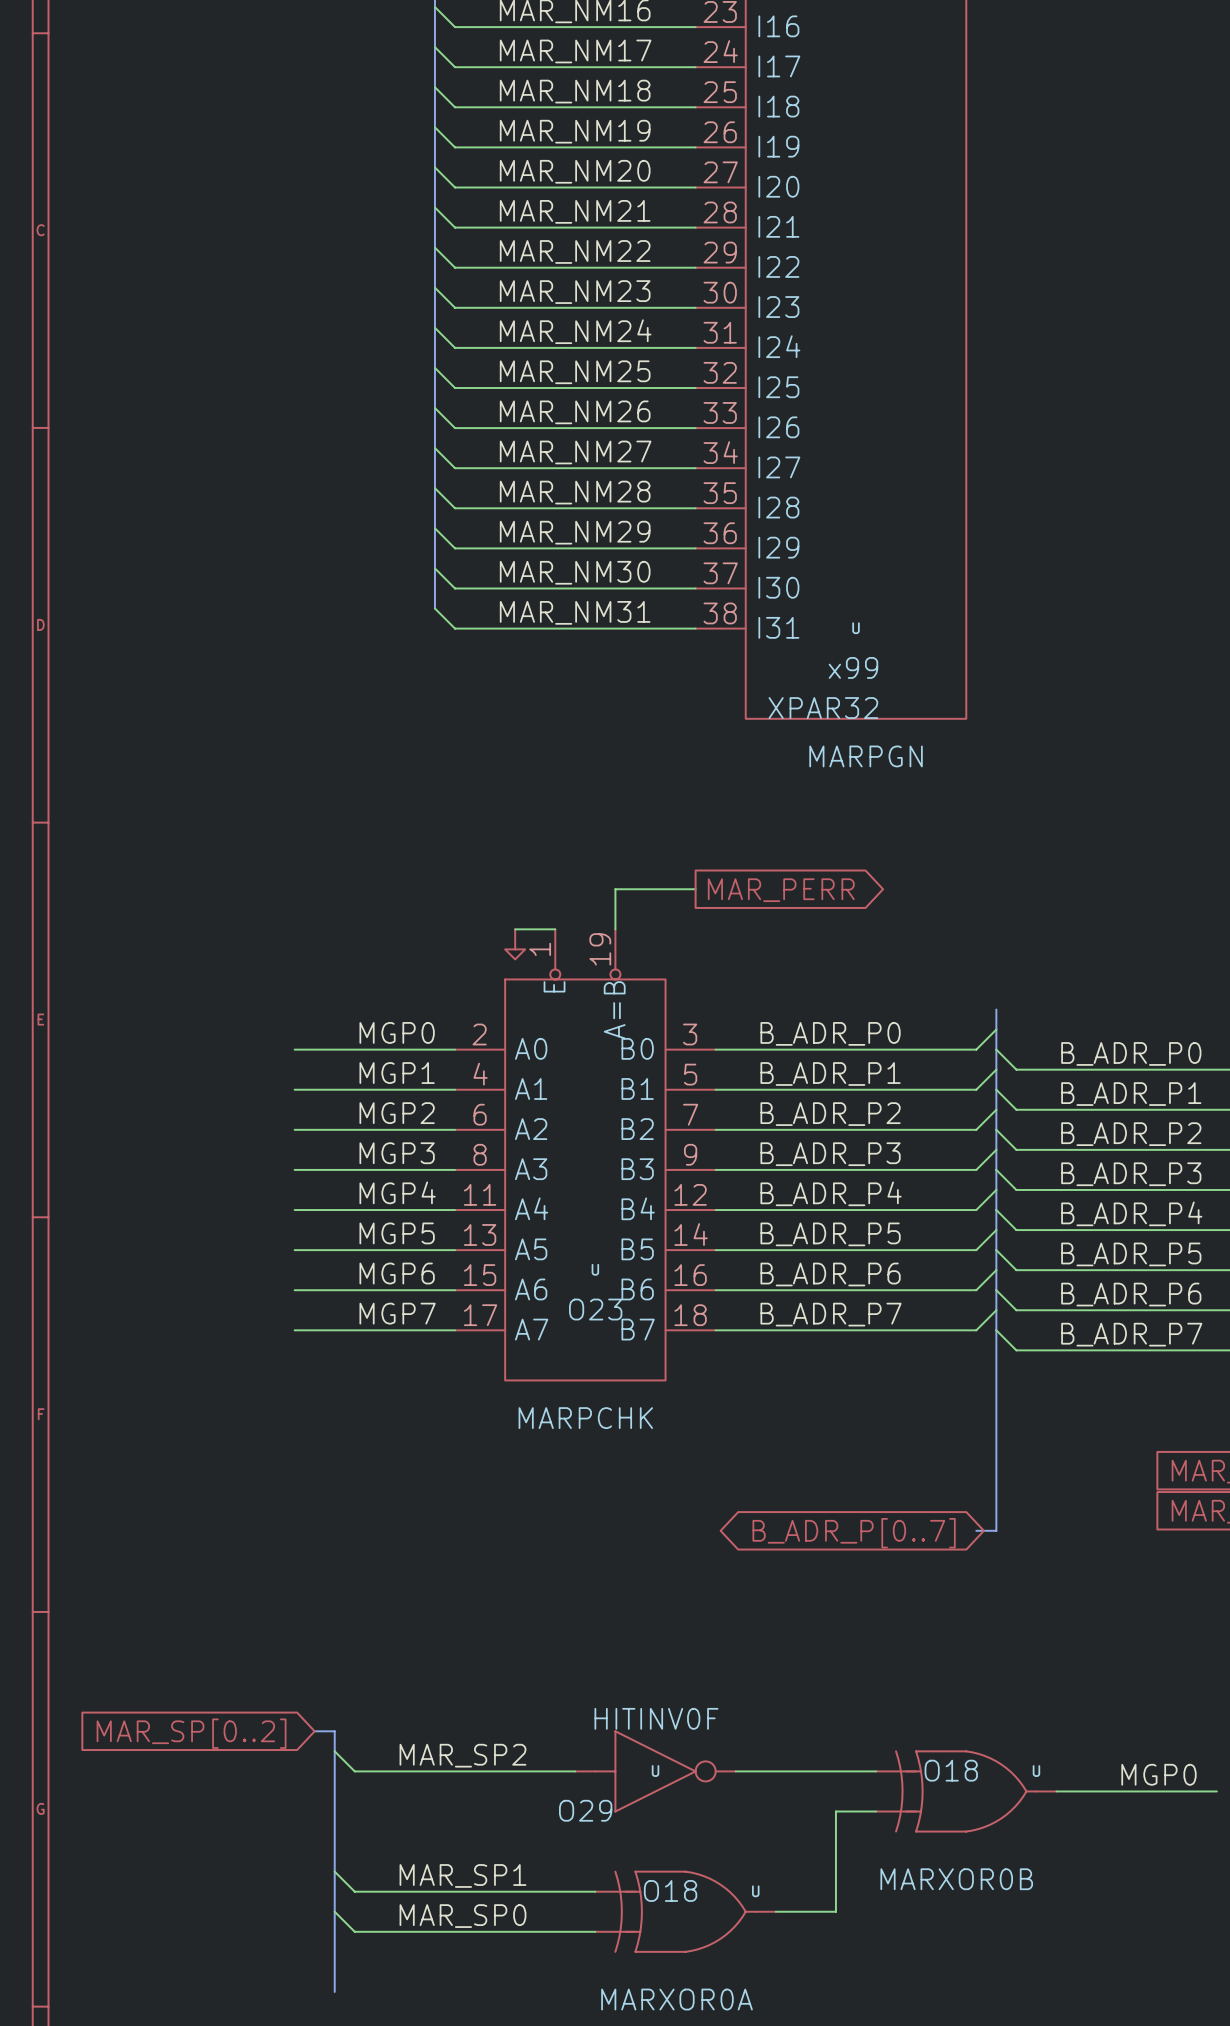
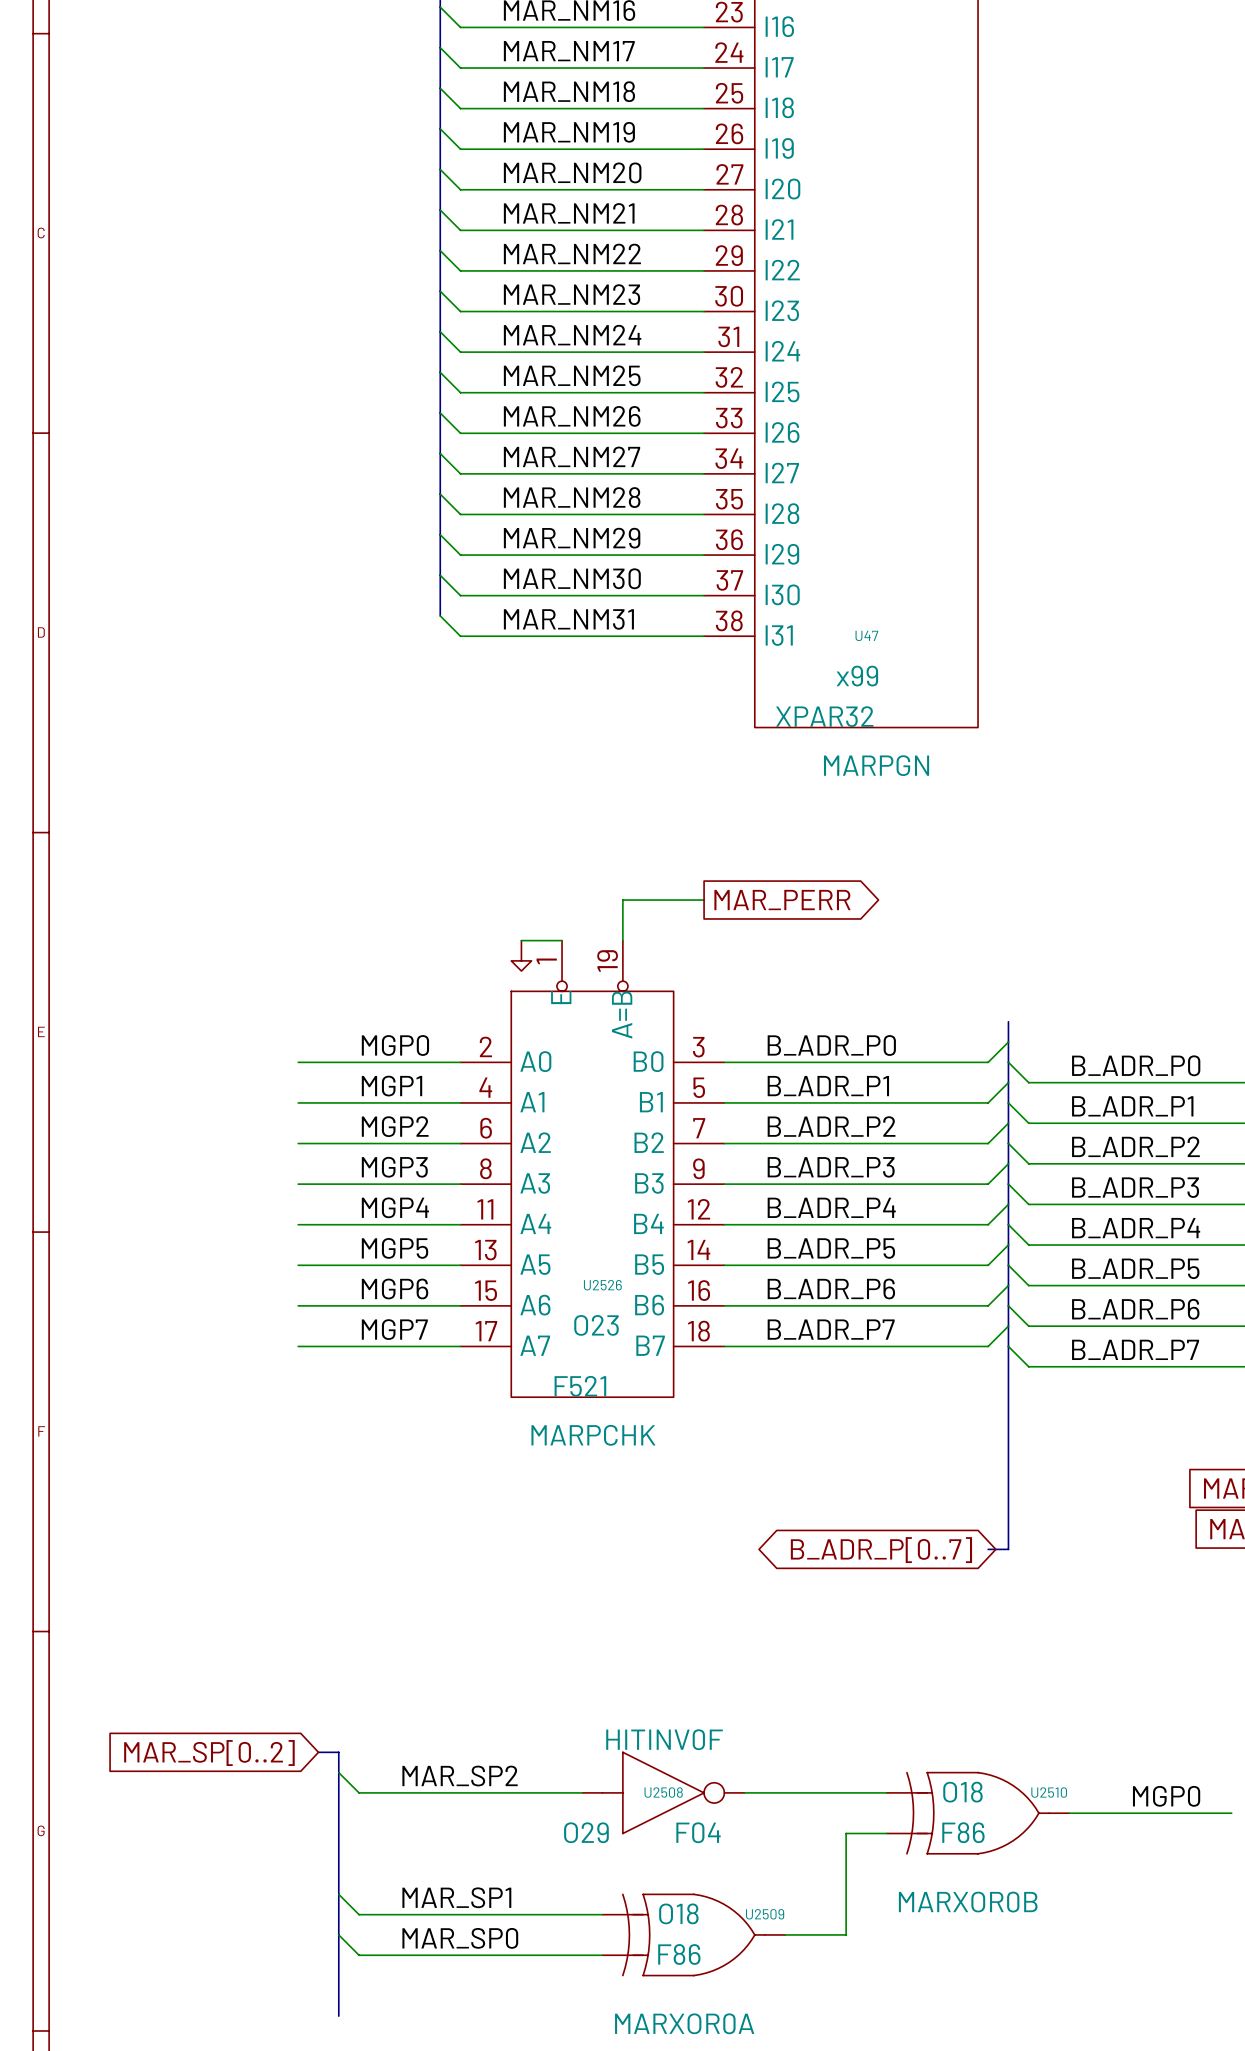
U name: U (856, 628) -> U47 (866, 635)
U name: U (595, 1269) -> U2526 (602, 1285)
U value: none -> F521 (580, 1386)
U name: U (655, 1771) -> U2508 (663, 1792)
U name: U (1036, 1771) -> U2510 (1049, 1792)
U value: none -> F04 (698, 1832)
U value: none -> F86 (963, 1832)
U name: U (755, 1891) -> U2509 (765, 1914)
U value: none -> F86 (679, 1954)

